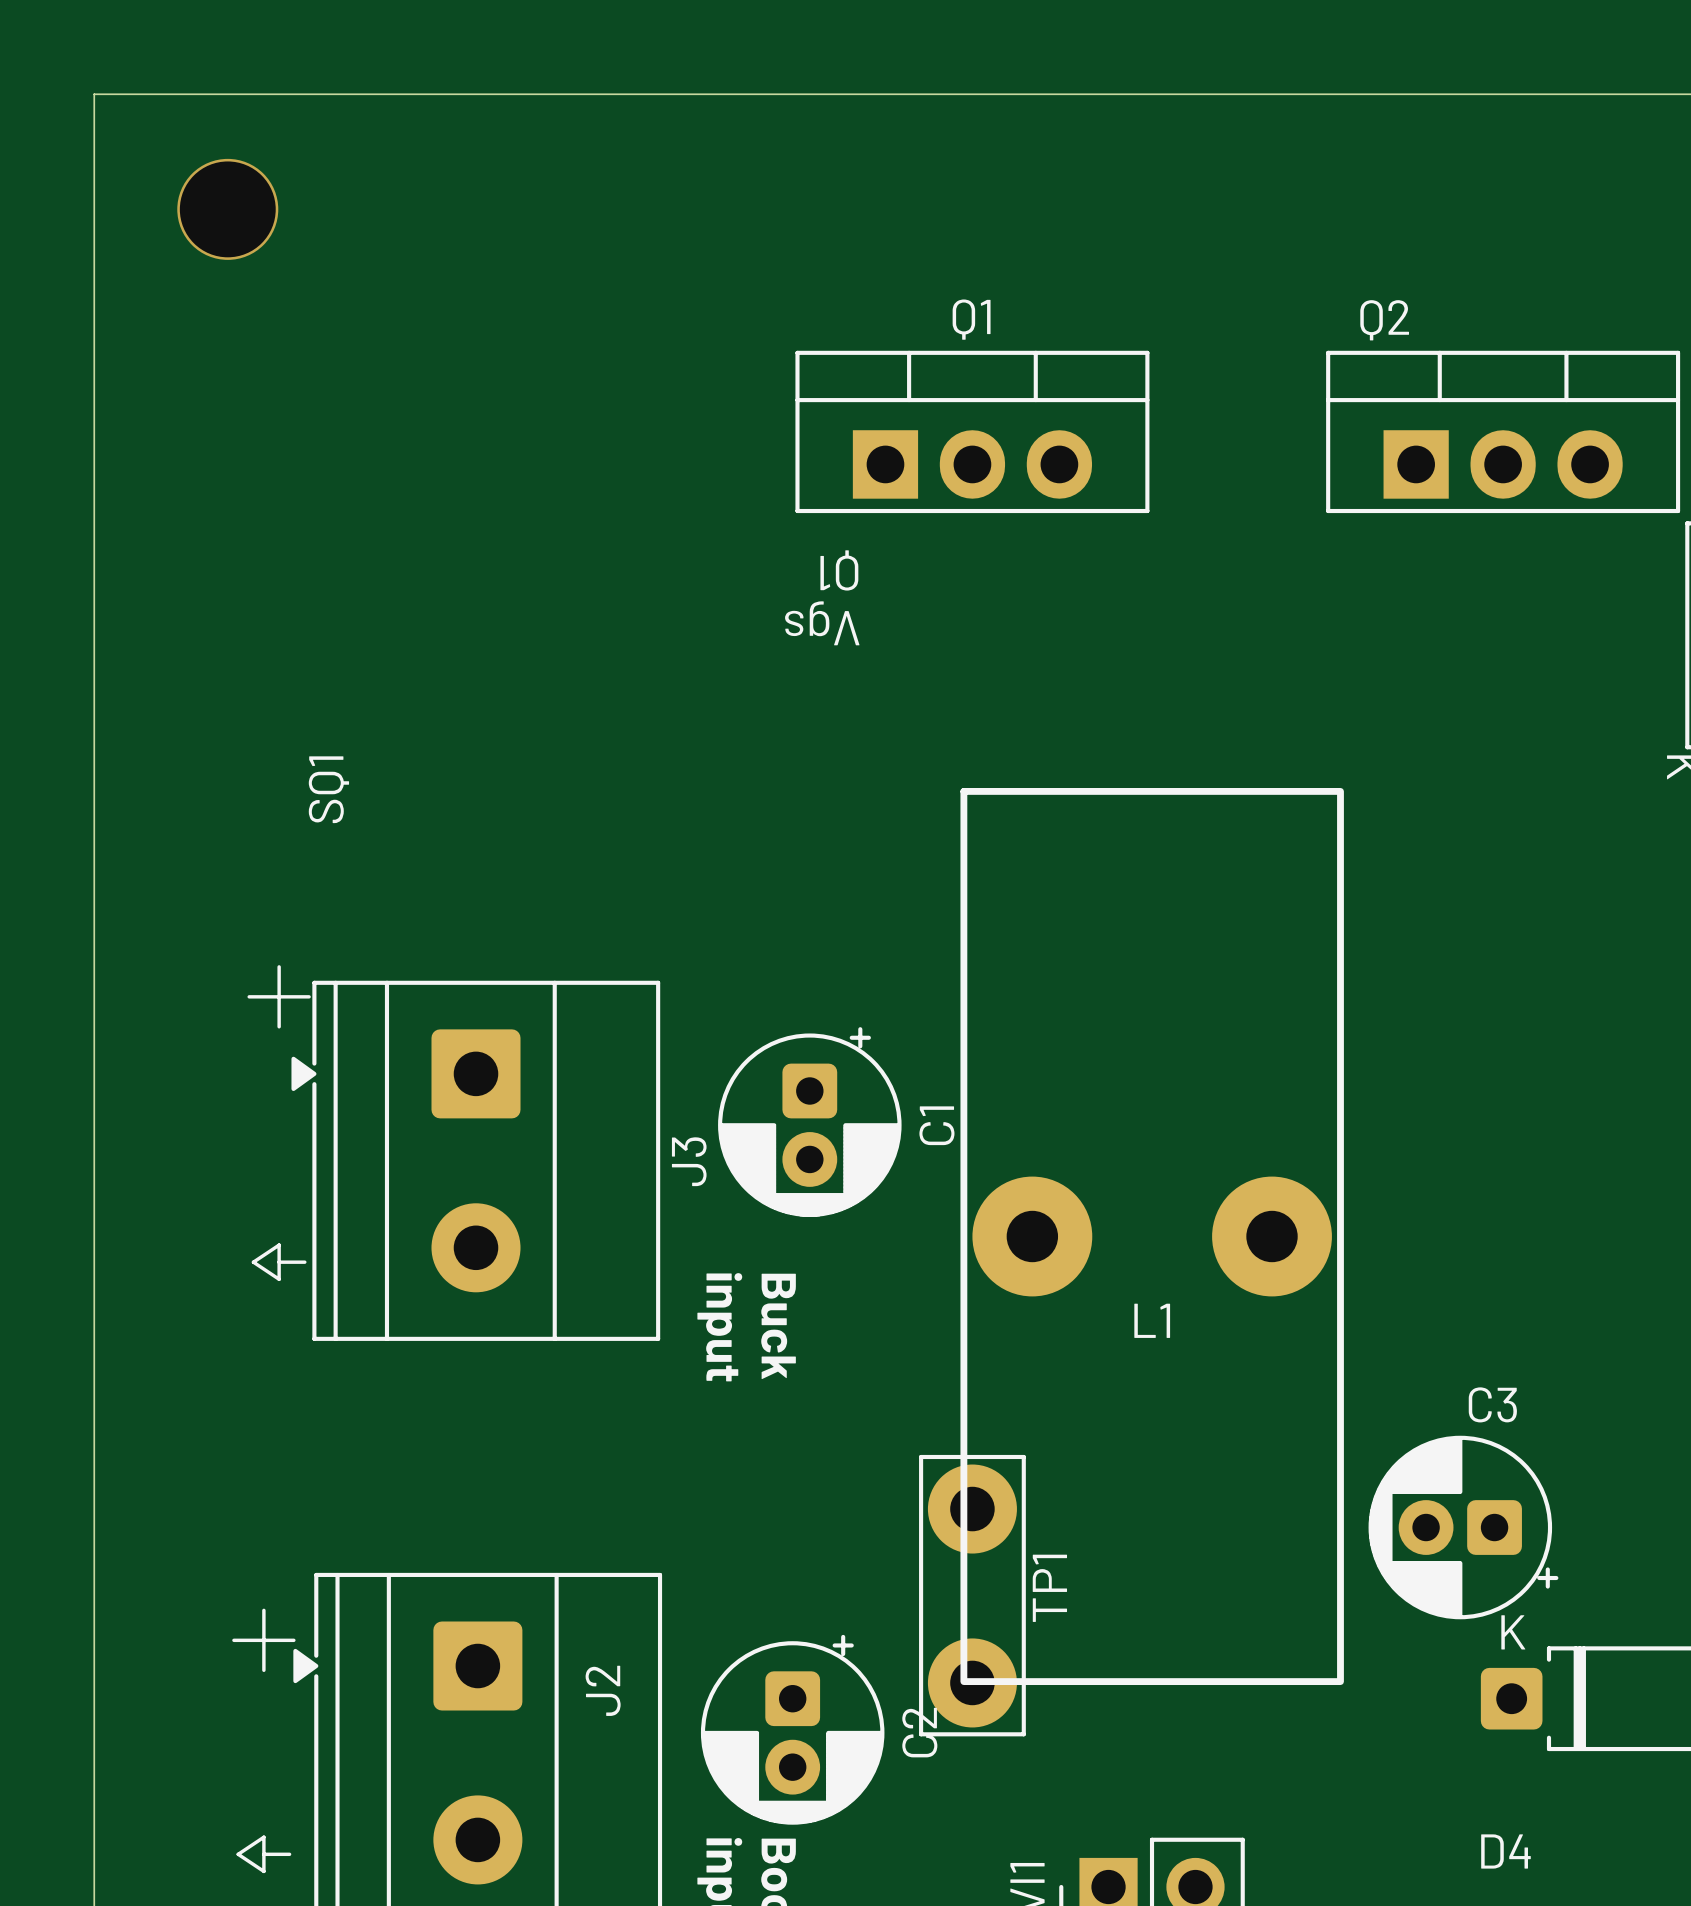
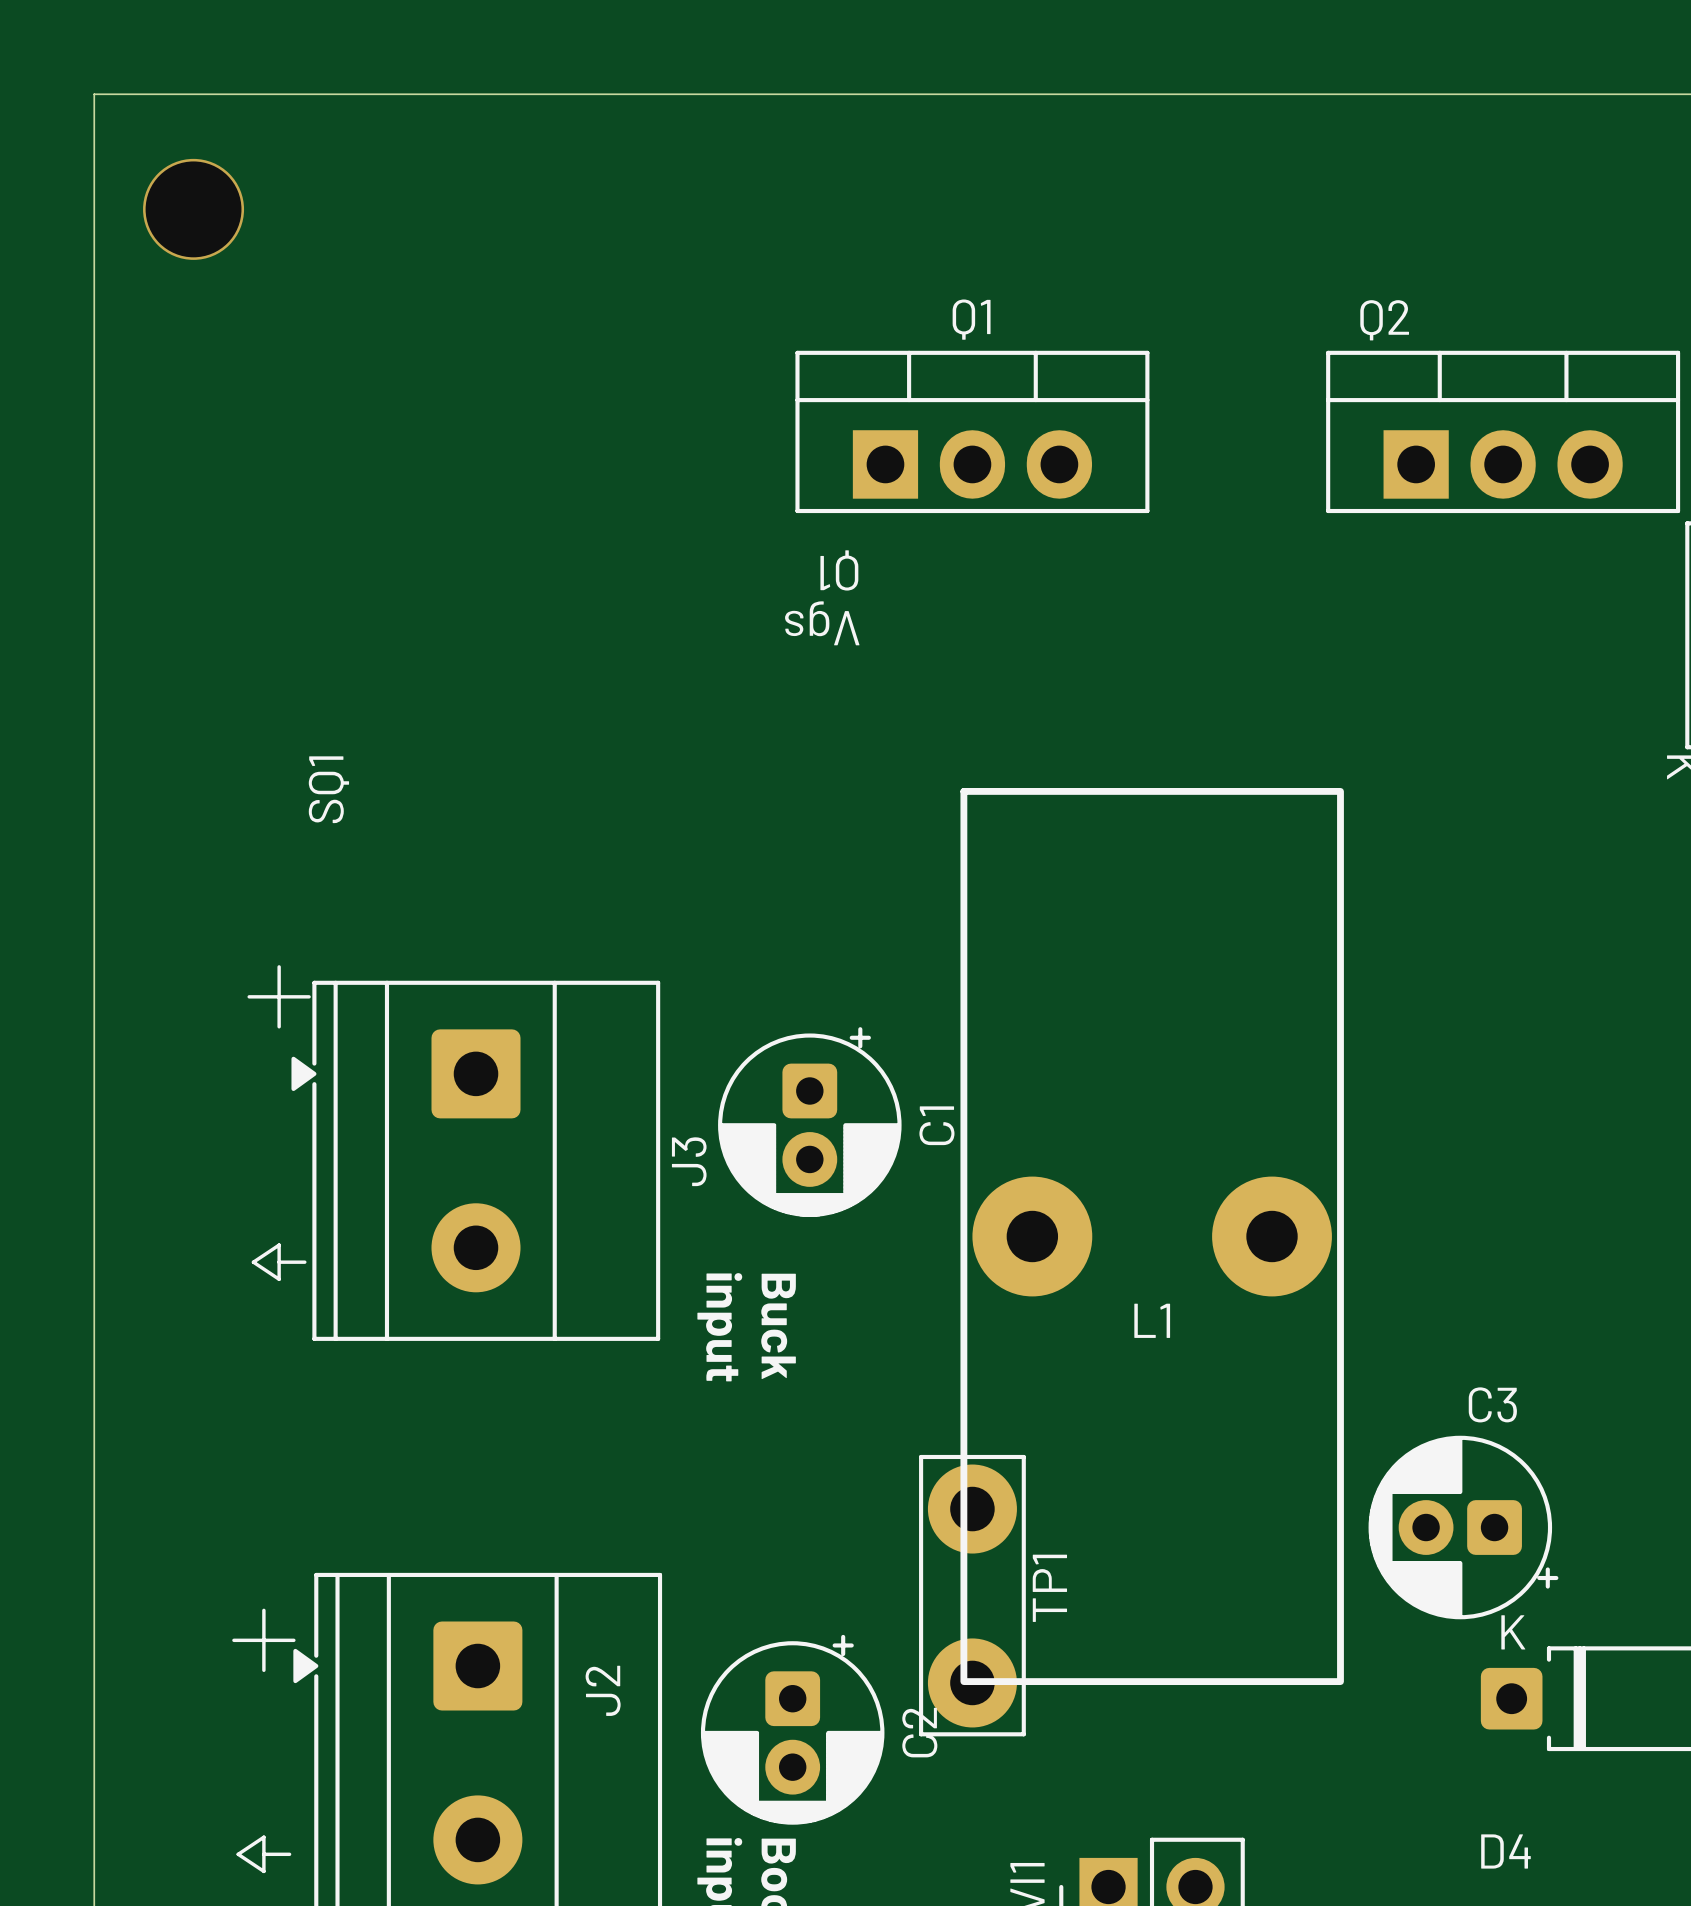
via position: (227, 209) -> (193, 209)

